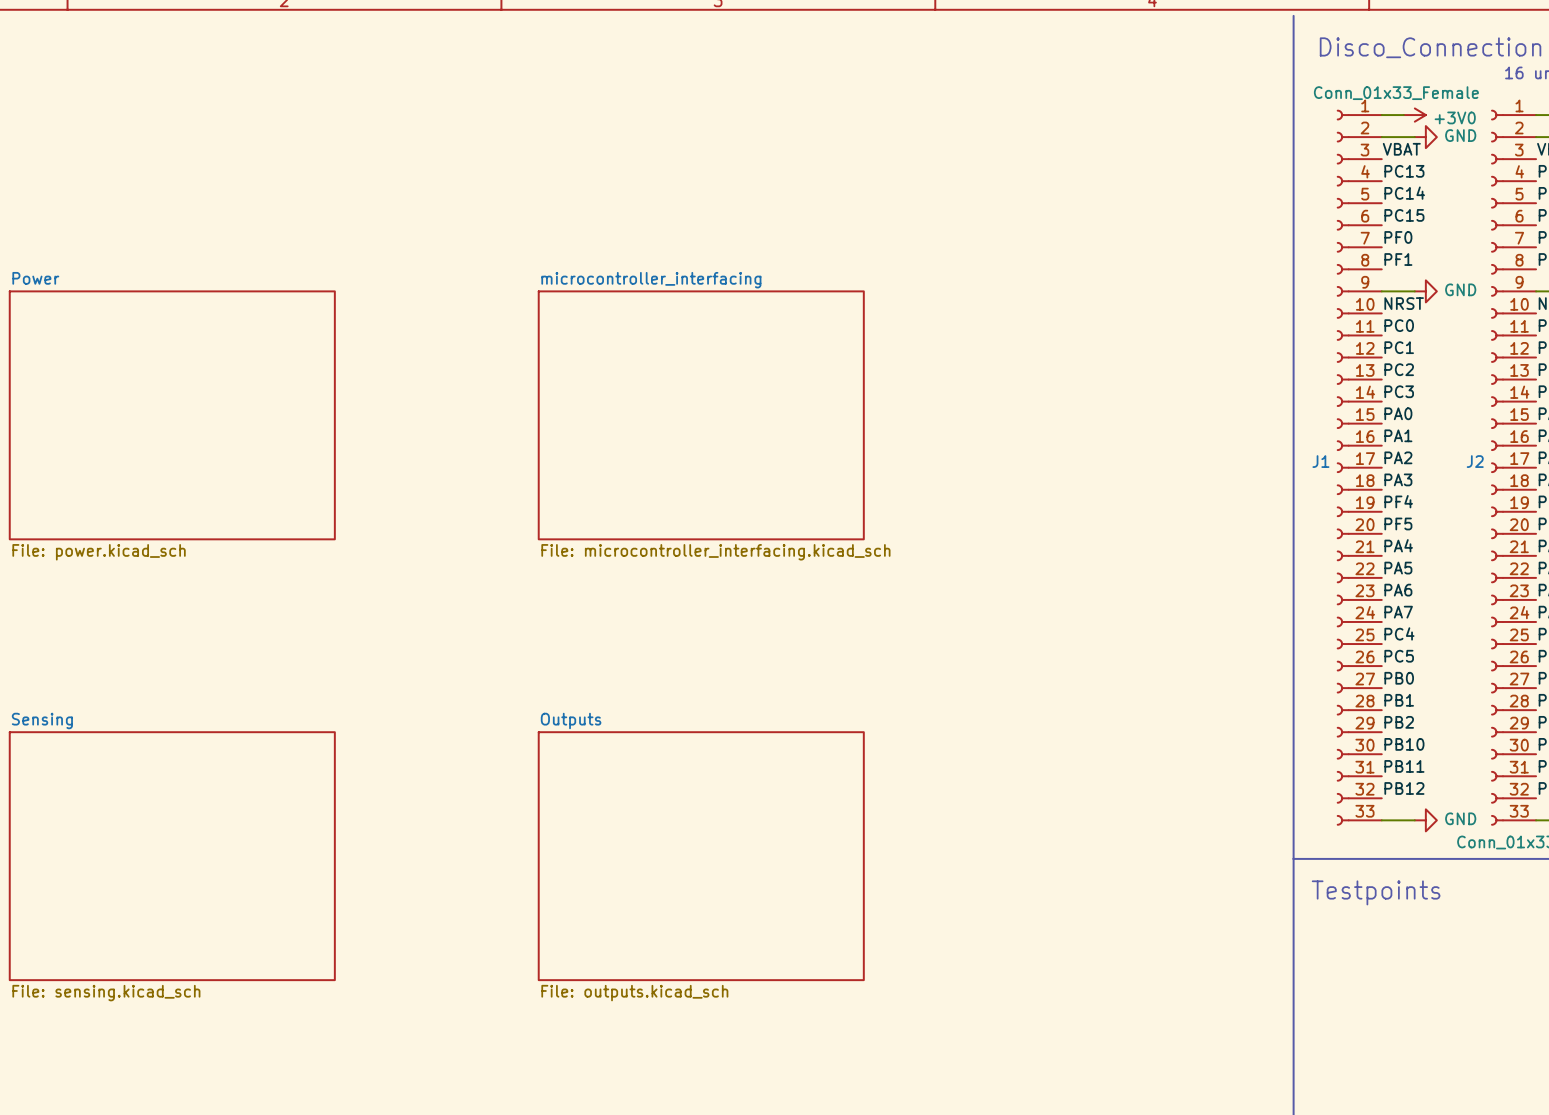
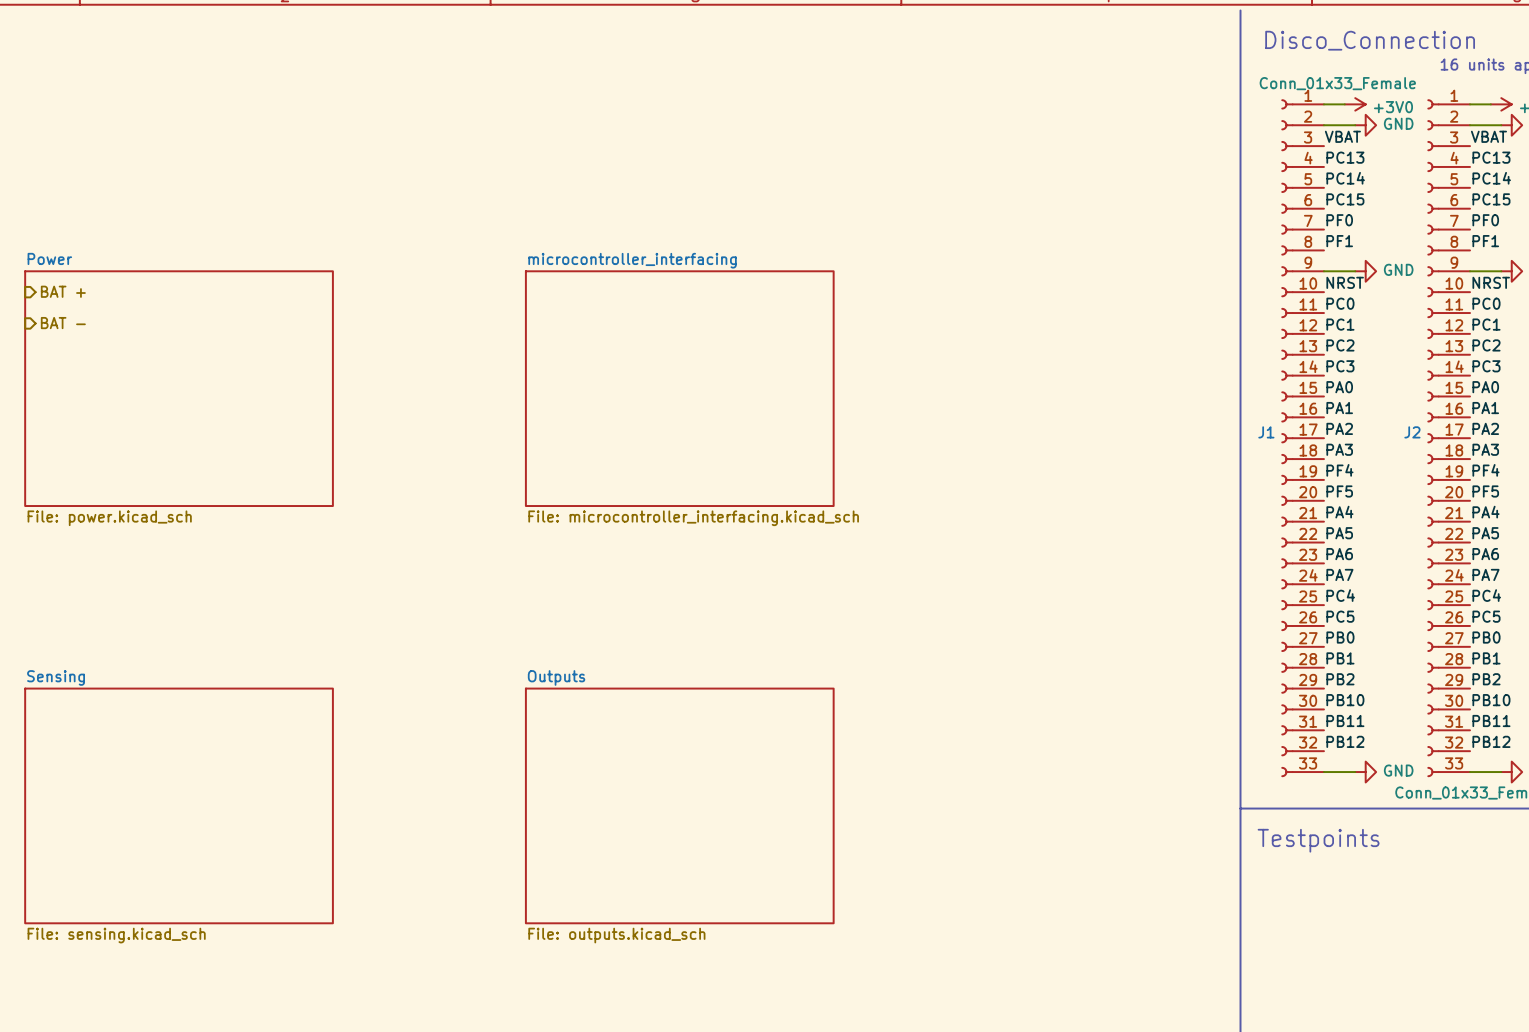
hierarchical label: none -> BAT + (63, 291)
hierarchical label: none -> BAT - (63, 323)

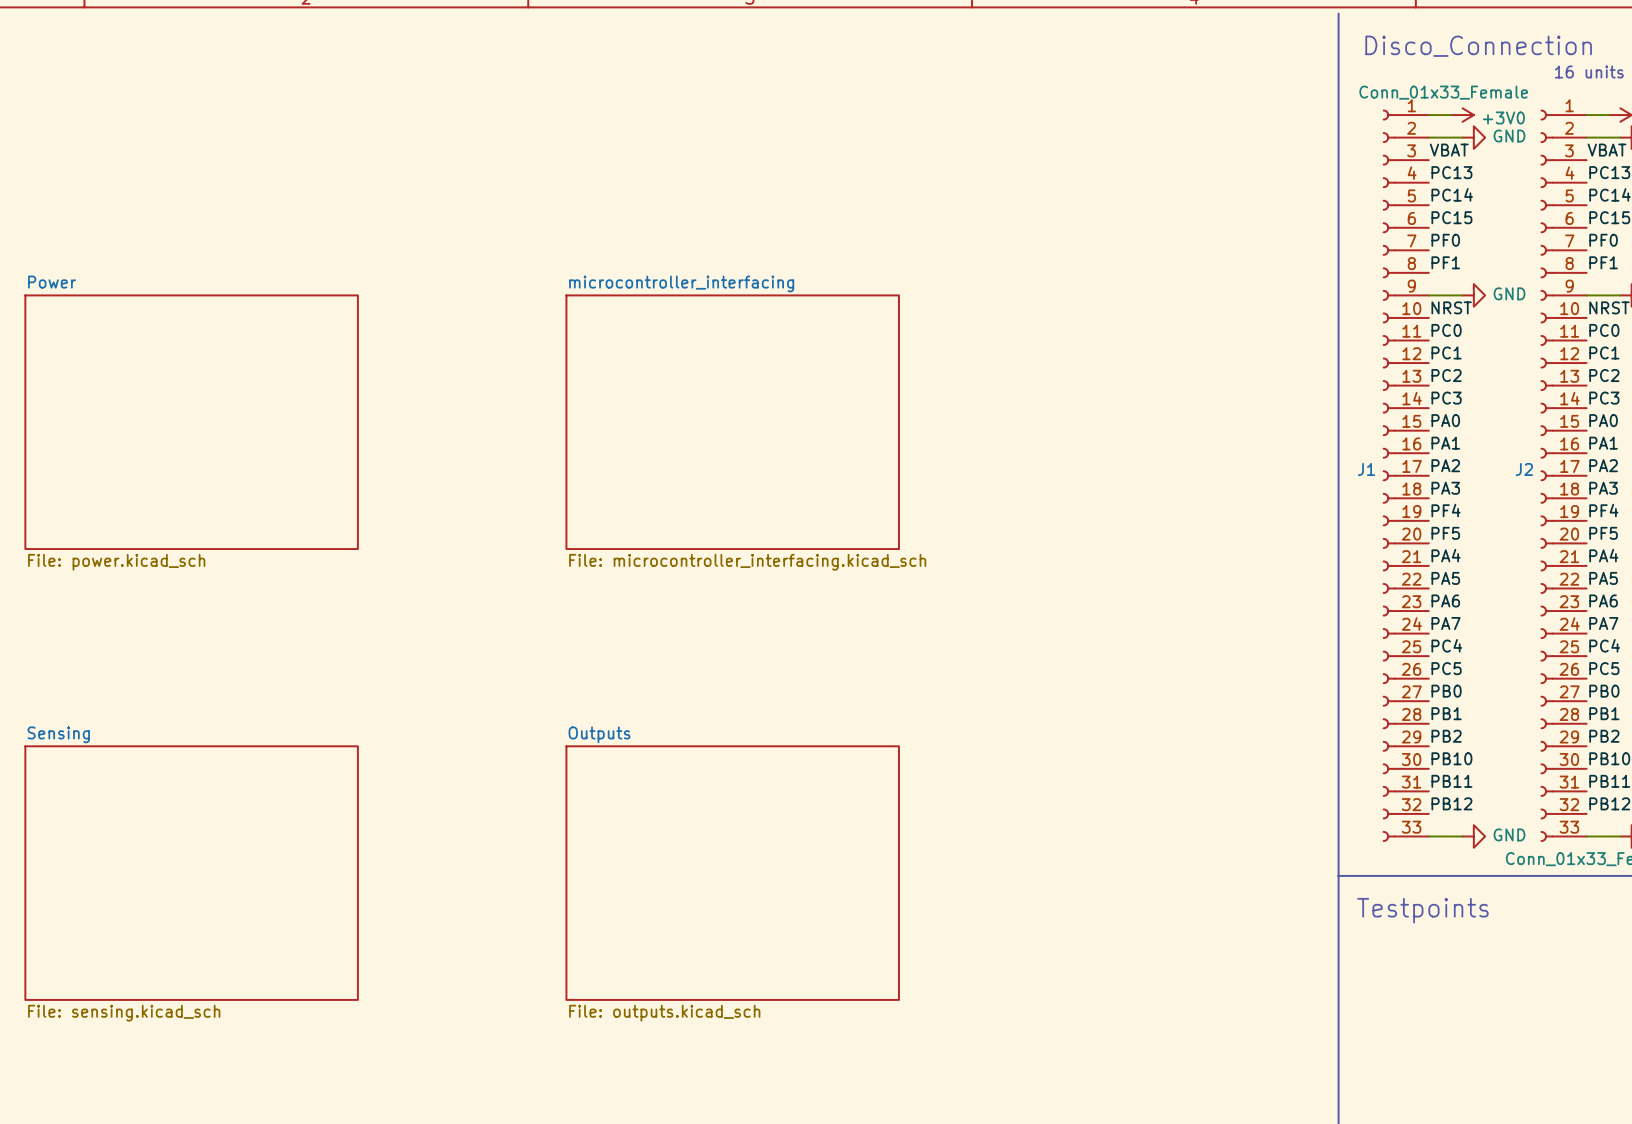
hierarchical label: BAT + (63, 291) -> none
hierarchical label: BAT - (63, 323) -> none

